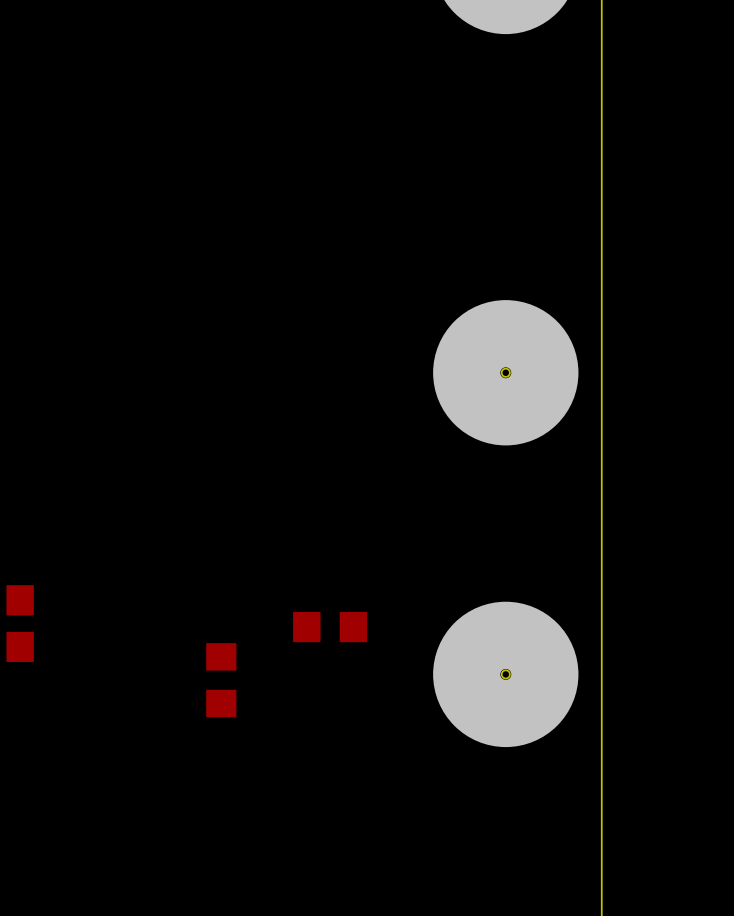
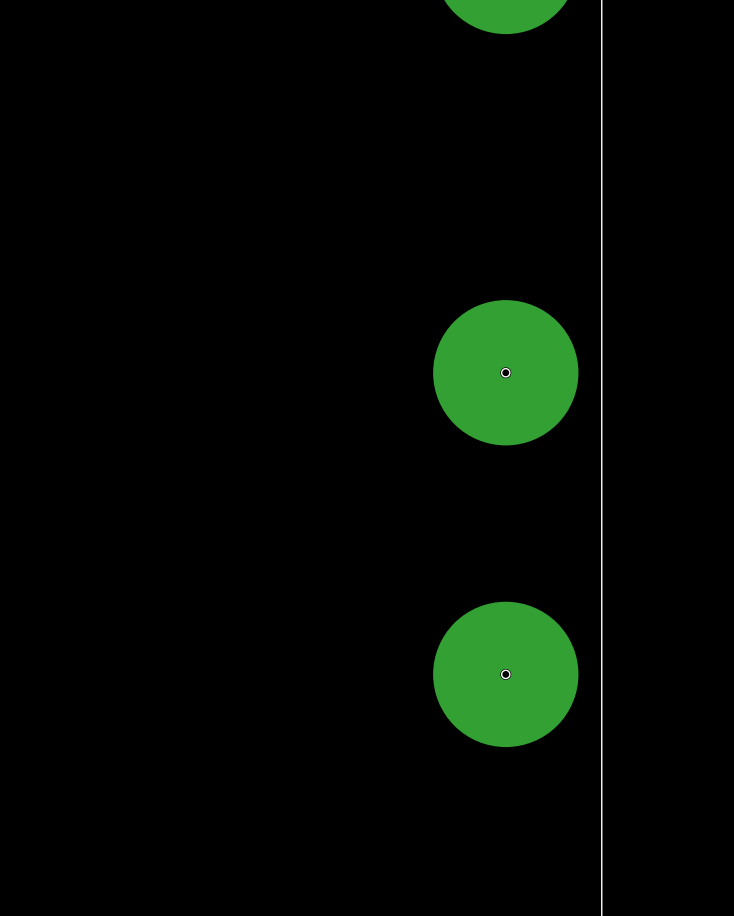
part: (20, 623) -> none
part: (330, 627) -> none
part: (221, 680) -> none

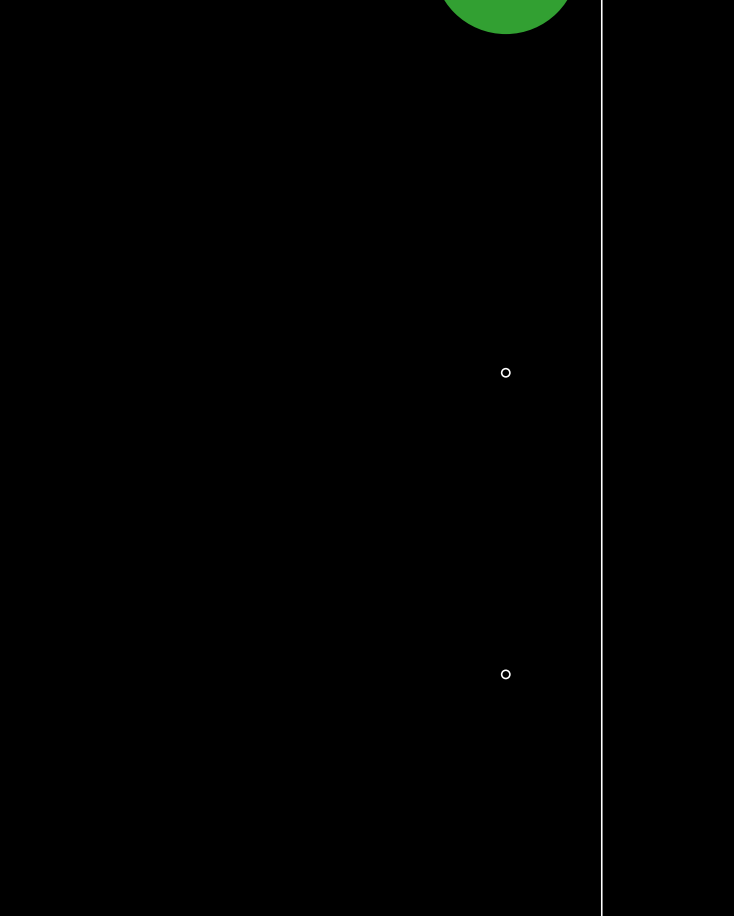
via: (505, 372) -> none
via: (505, 674) -> none

